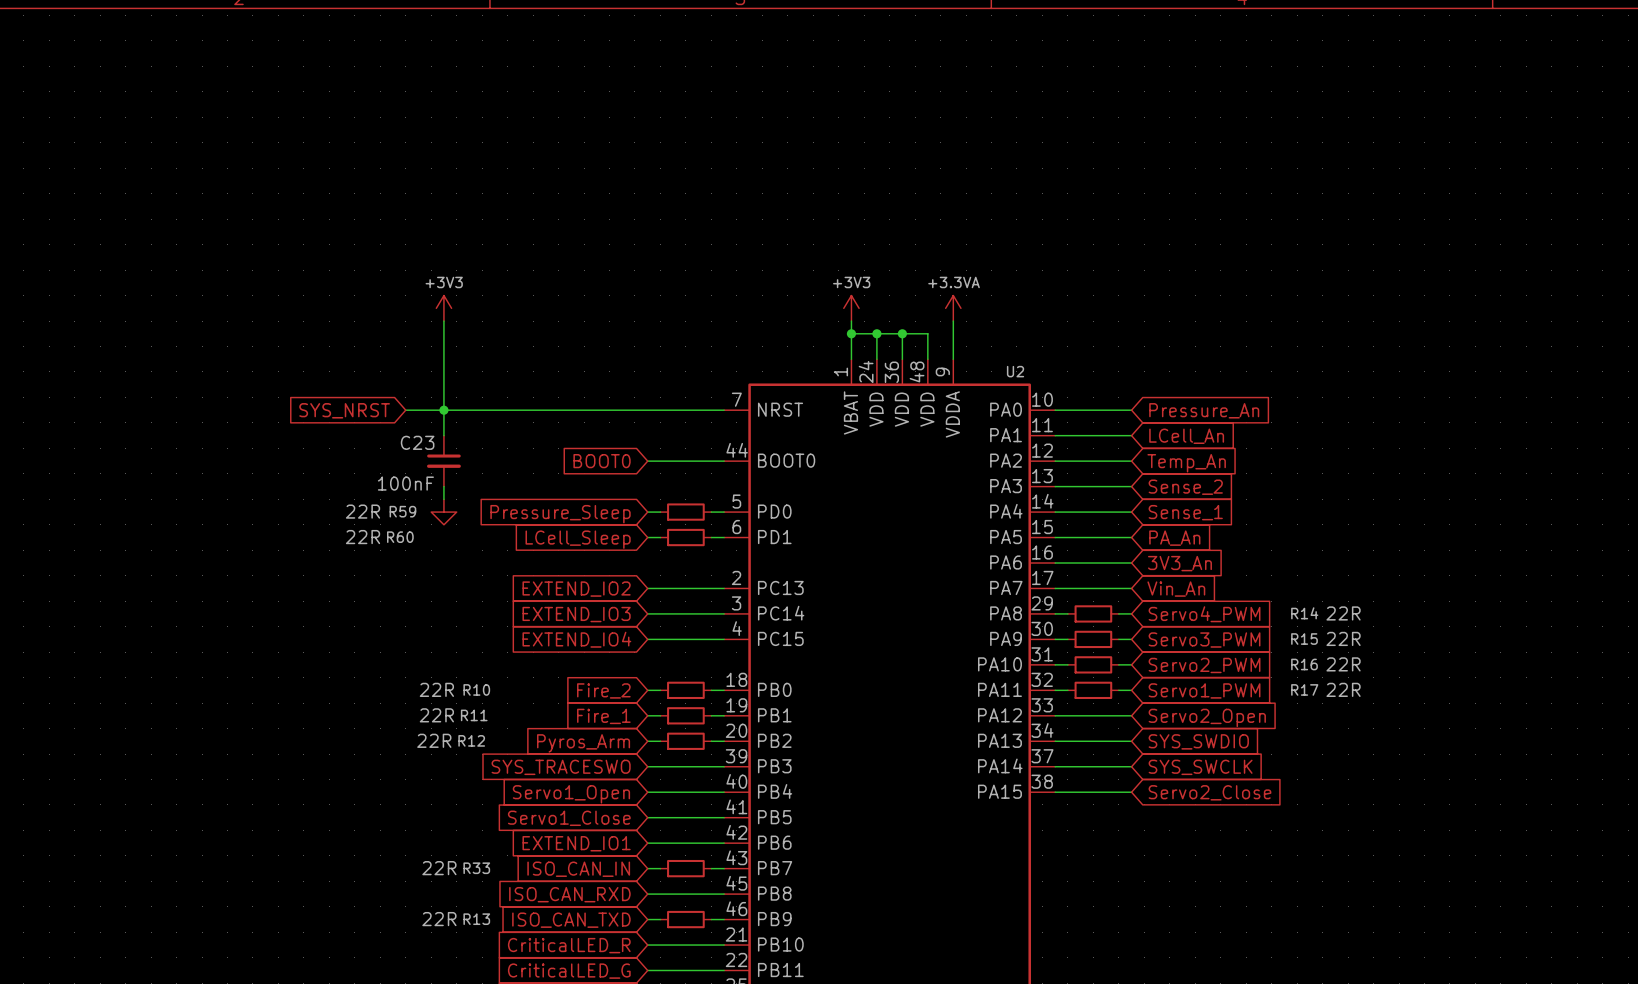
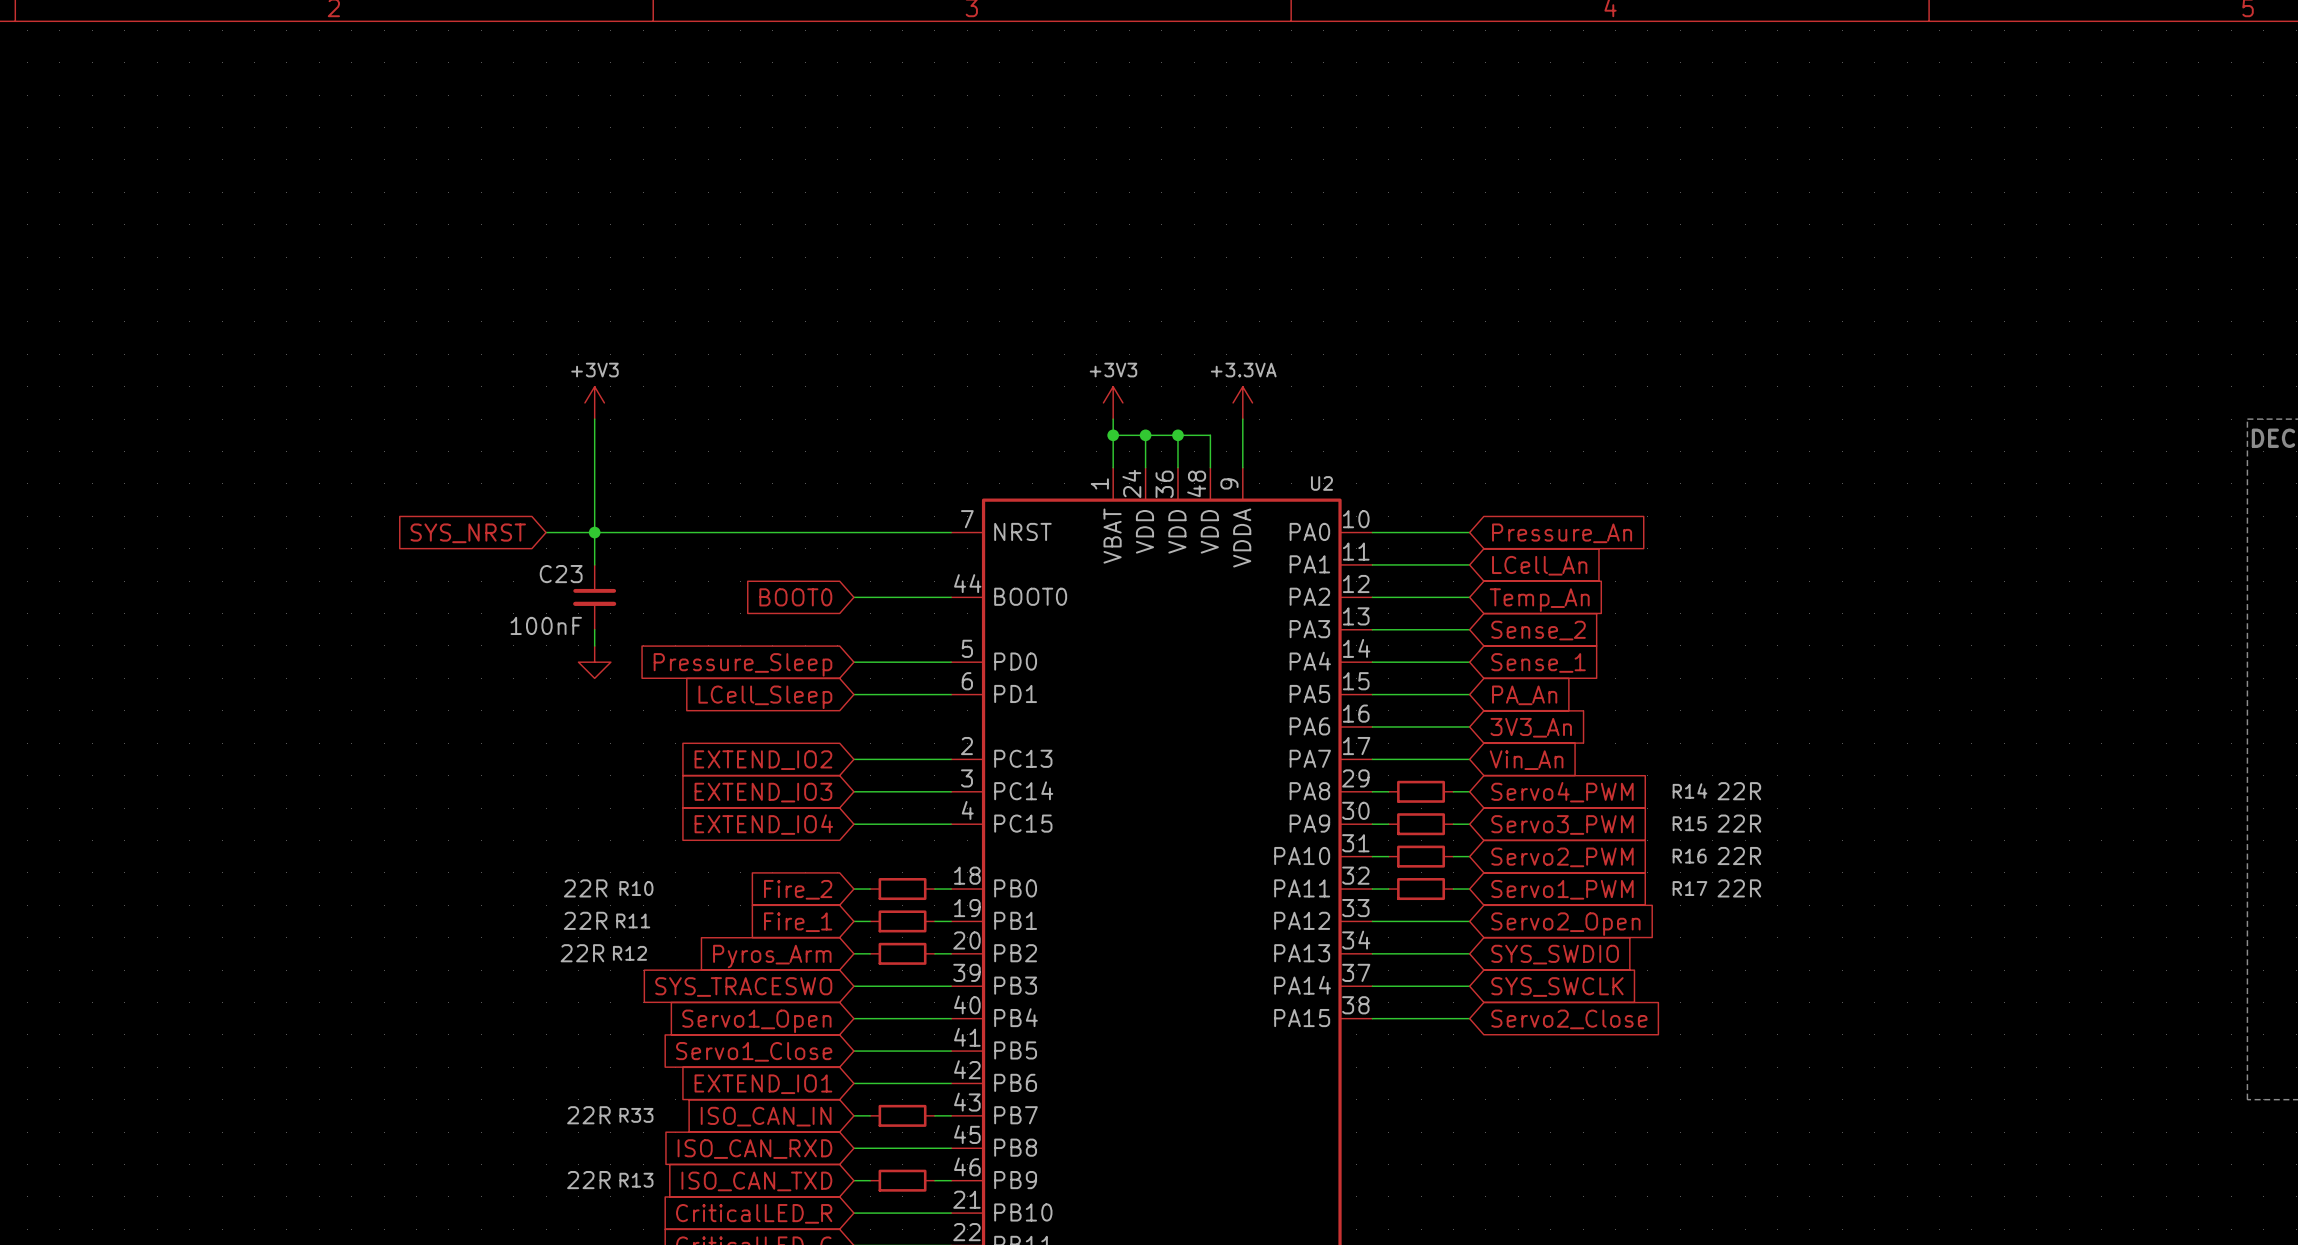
wire: none -> (870, 662) (934, 662)
R59: 22R (685, 512) -> none
wire: none -> (870, 694) (934, 694)
R60: 22R (685, 537) -> none

